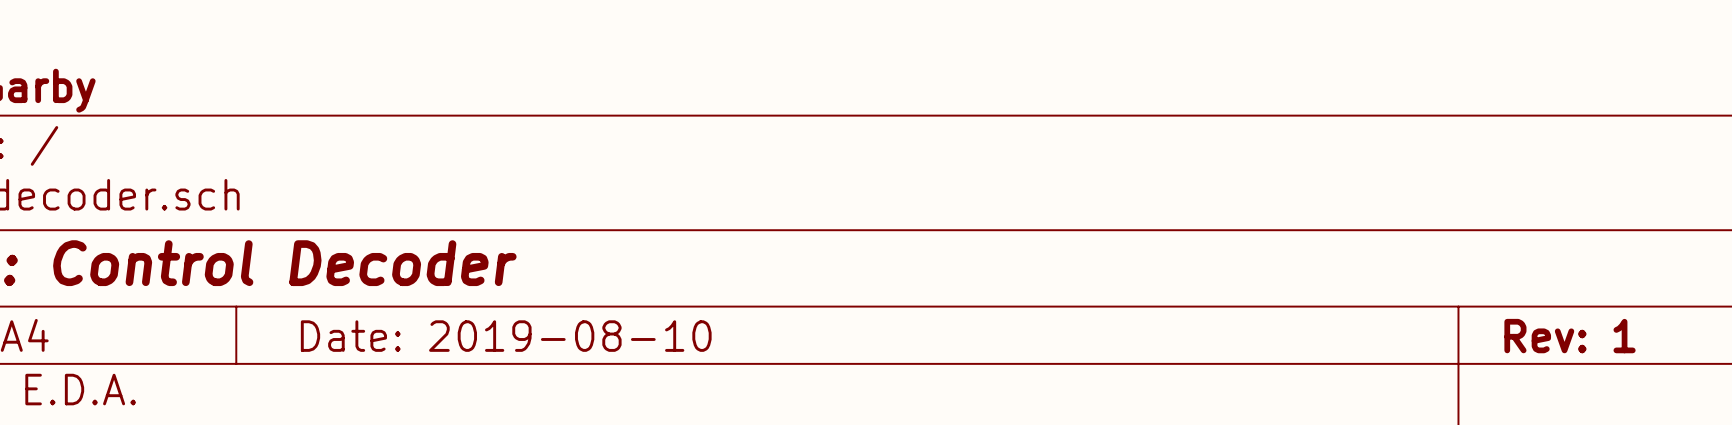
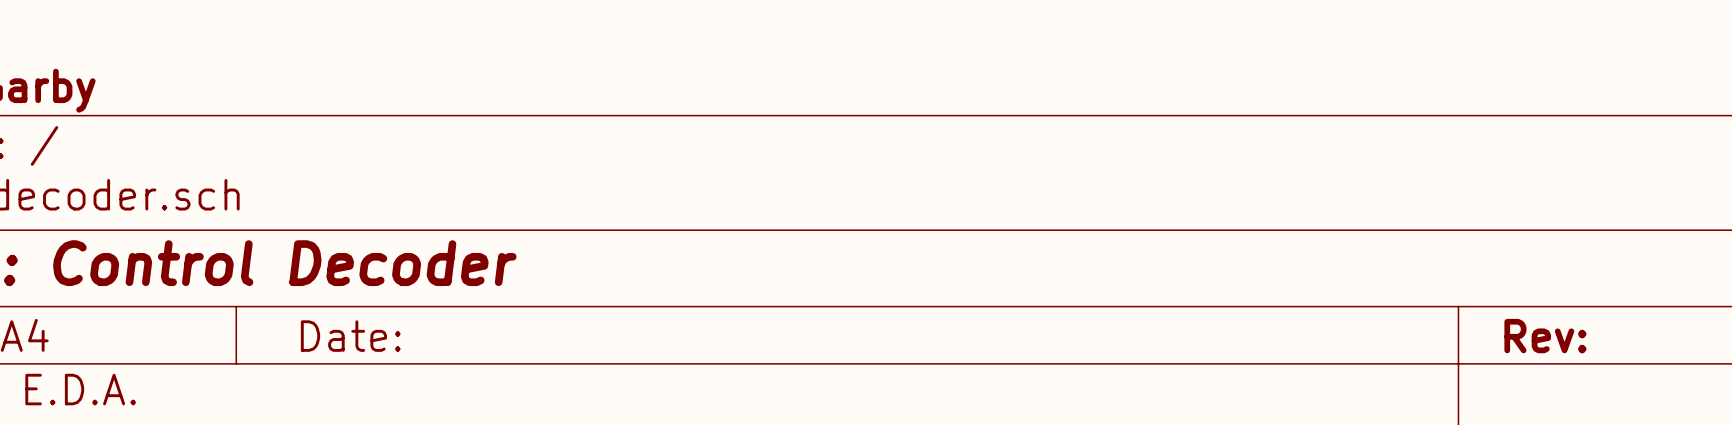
title block: Date: 2019-08-10 (506, 336) -> Date: (350, 336)
title block: Rev: 1 (1570, 336) -> Rev: (1545, 336)

